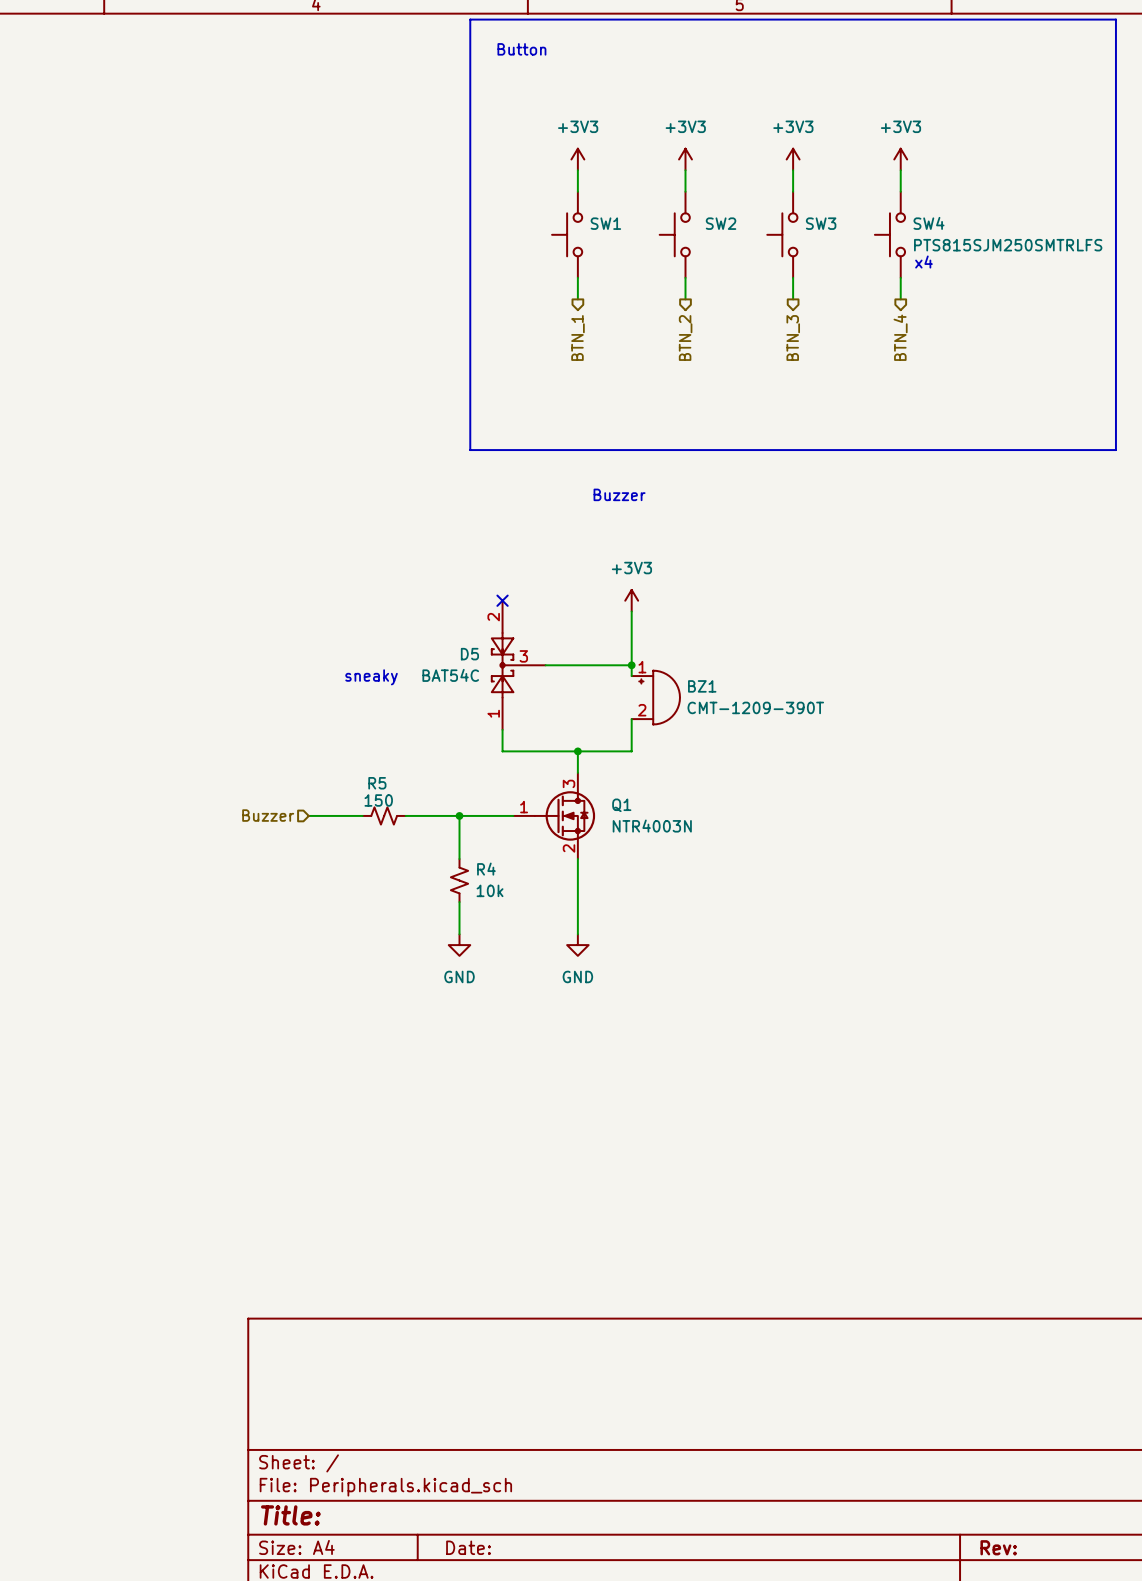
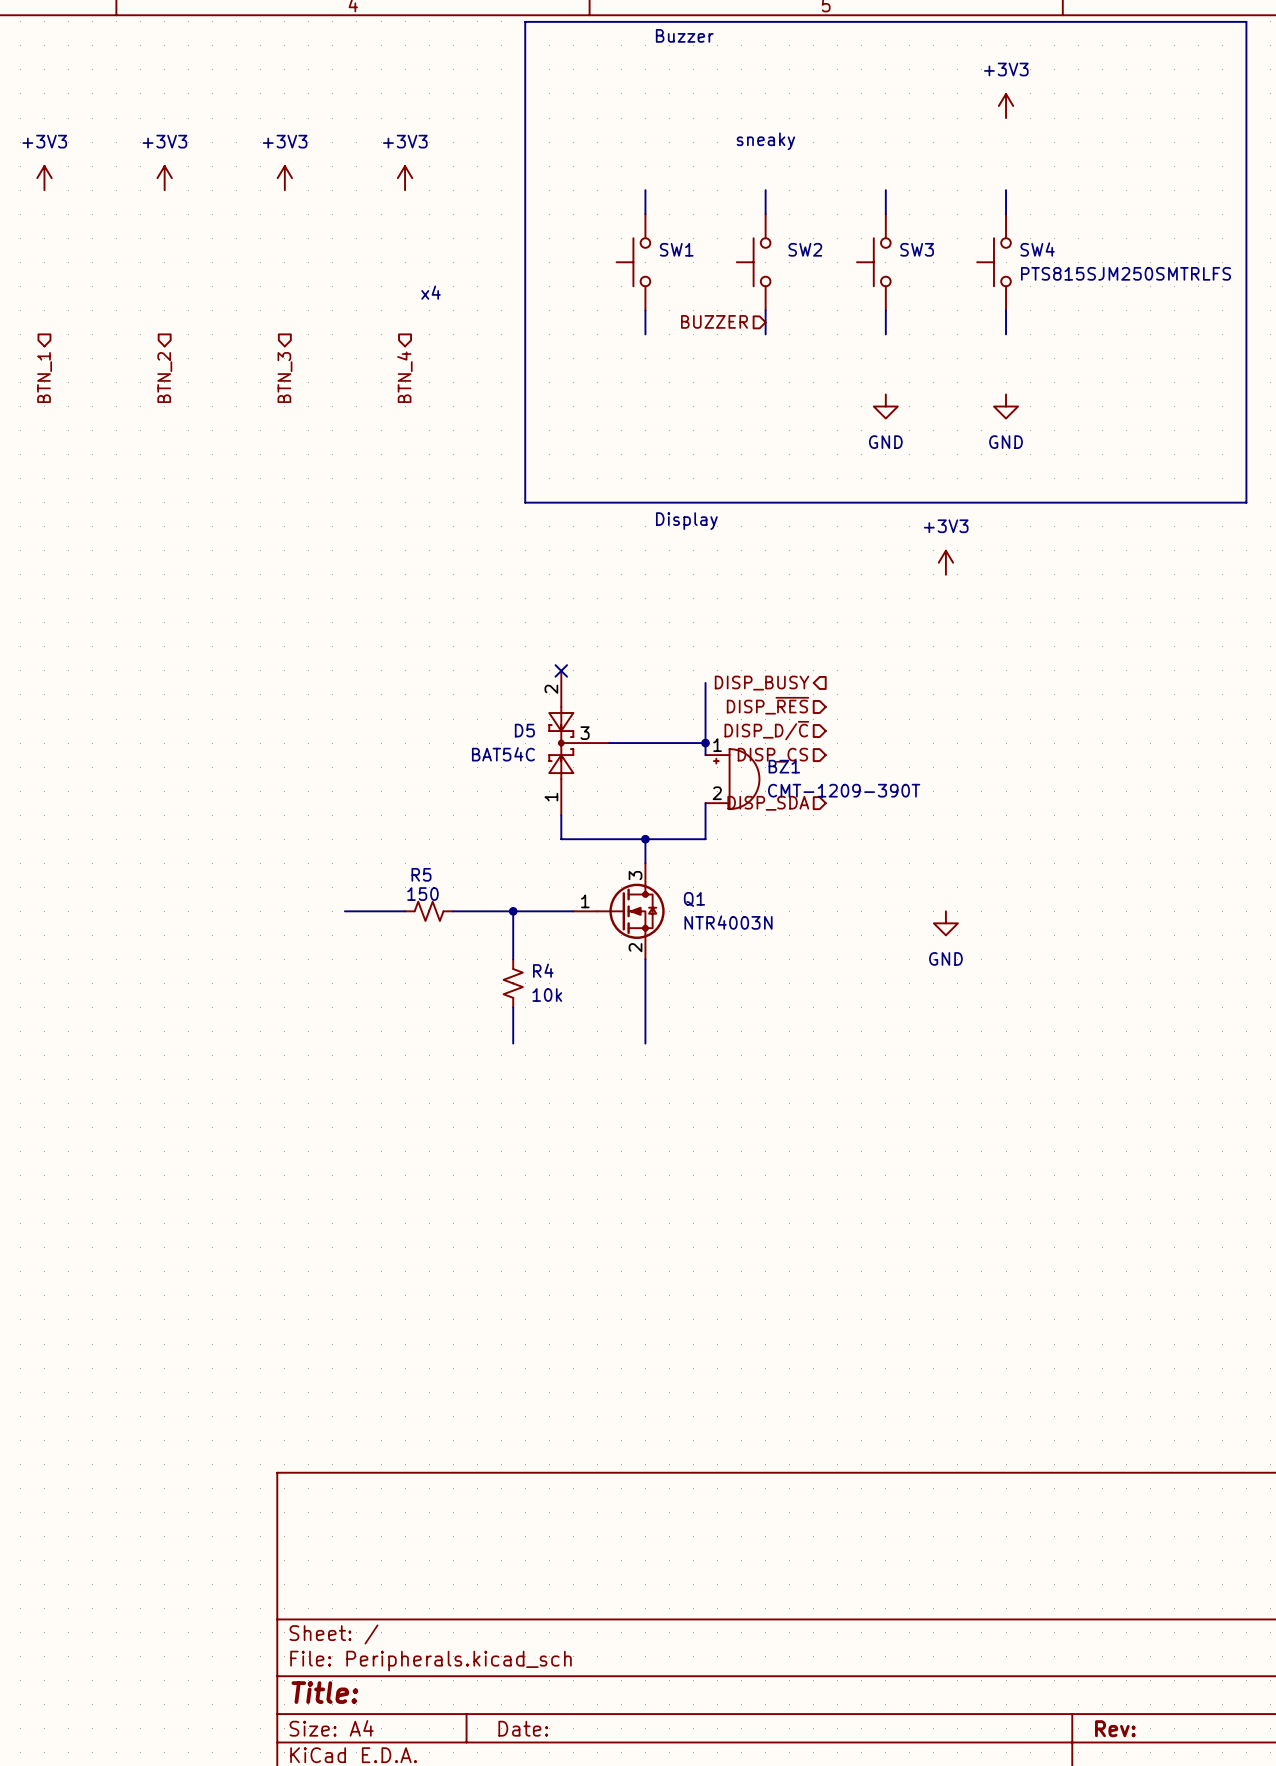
text: none -> Buzzer (684, 35)
text: Button (521, 49) -> none
power symbol: none -> +3V3 (1006, 106)
text: none -> sneaky (765, 141)
power symbol: none -> +3V3 (44, 178)
power symbol: none -> +3V3 (164, 178)
power symbol: none -> +3V3 (284, 178)
power symbol: none -> +3V3 (405, 178)
power symbol: +3V3 (577, 159) -> none
power symbol: +3V3 (685, 159) -> none
power symbol: +3V3 (793, 159) -> none
power symbol: +3V3 (900, 159) -> none
text: none -> x4 (431, 292)
text: x4 (923, 262) -> none
hierarchical label: none -> BUZZER (714, 321)
hierarchical label: none -> BTN_1 (44, 377)
hierarchical label: none -> BTN_2 (164, 377)
hierarchical label: none -> BTN_3 (284, 377)
hierarchical label: none -> BTN_4 (404, 377)
hierarchical label: BTN_1 (577, 337) -> none
hierarchical label: BTN_2 (685, 337) -> none
hierarchical label: BTN_3 (793, 337) -> none
hierarchical label: BTN_4 (900, 337) -> none
power symbol: none -> GND (885, 406)
power symbol: none -> GND (1006, 406)
text: none -> Display (686, 521)
text: Buzzer (619, 494) -> none
power symbol: none -> +3V3 (945, 562)
power symbol: +3V3 (631, 600) -> none
hierarchical label: none -> DISP_BUSY (762, 683)
hierarchical label: none -> DISP_~{RES} (767, 705)
hierarchical label: none -> DISP_D/~{C} (766, 730)
hierarchical label: none -> DISP_CS (772, 755)
text: sneaky (371, 677) -> none
hierarchical label: none -> DISP_SDA (768, 803)
hierarchical label: Buzzer (268, 815) -> none
power symbol: none -> GND (945, 923)
power symbol: GND (459, 945) -> none
power symbol: GND (577, 945) -> none

